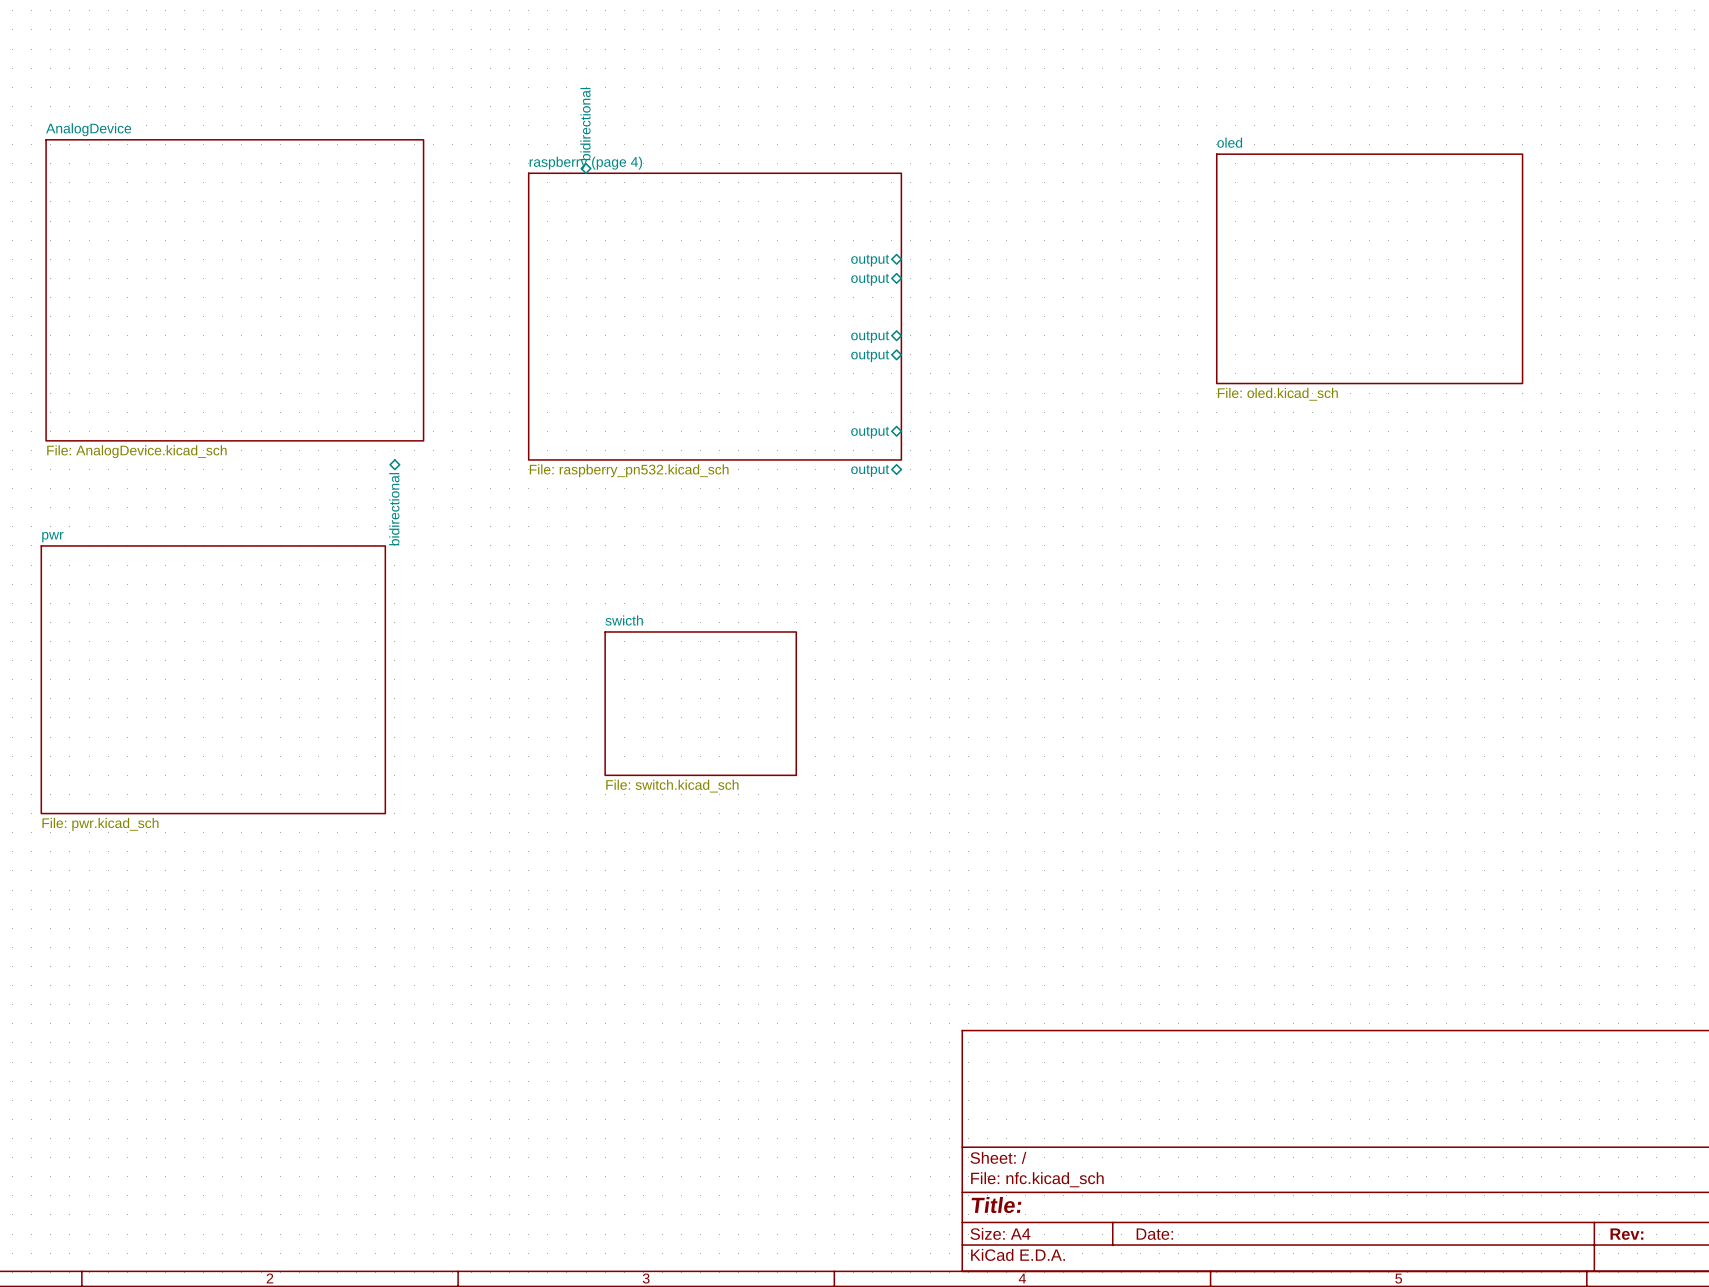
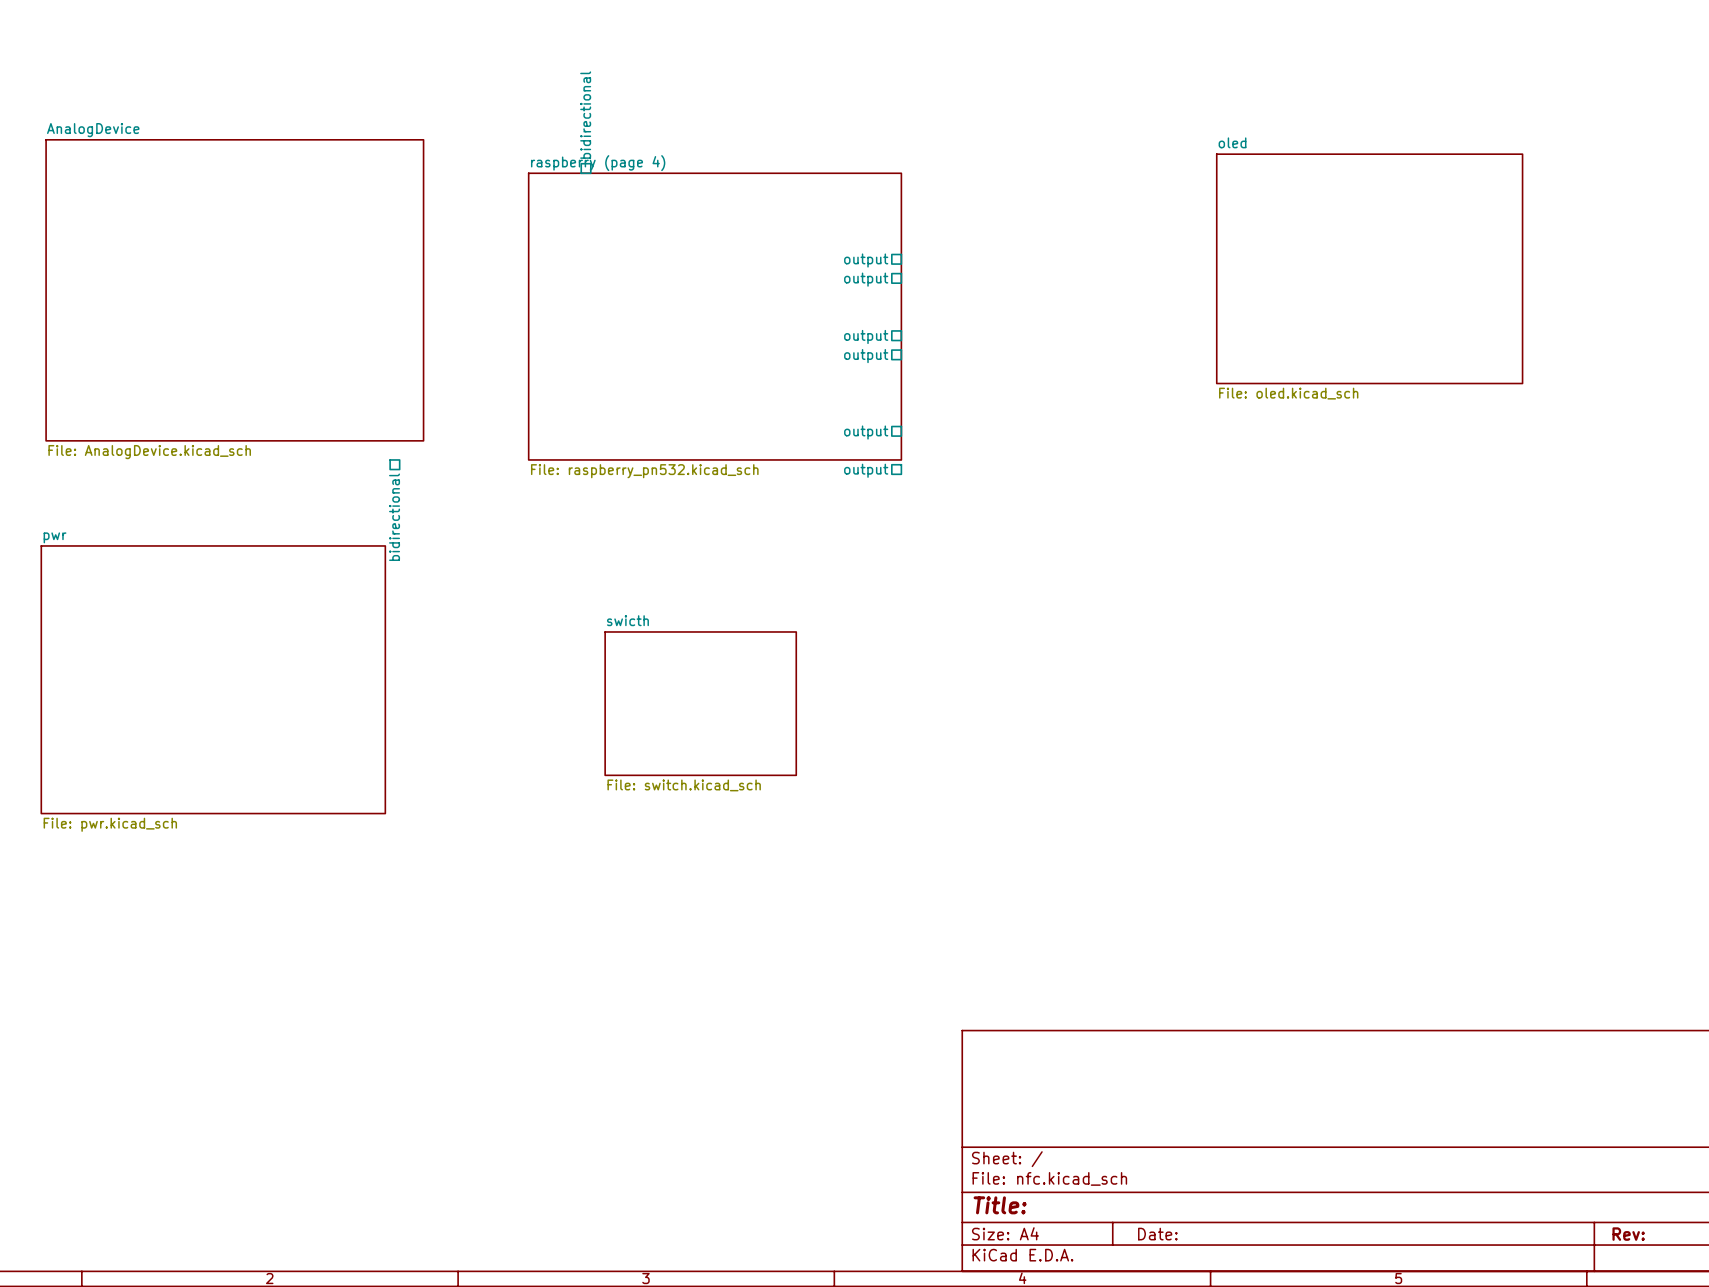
sheet pin shape: bidirectional (585, 124) -> passive (585, 115)
sheet pin shape: bidirectional (870, 260) -> passive (866, 260)
sheet pin shape: bidirectional (870, 279) -> passive (866, 279)
sheet pin shape: bidirectional (870, 337) -> passive (866, 336)
sheet pin shape: bidirectional (870, 356) -> passive (866, 356)
sheet pin shape: bidirectional (870, 432) -> passive (866, 432)
sheet pin shape: bidirectional (870, 470) -> passive (866, 470)
sheet pin shape: bidirectional (394, 509) -> passive (394, 517)

